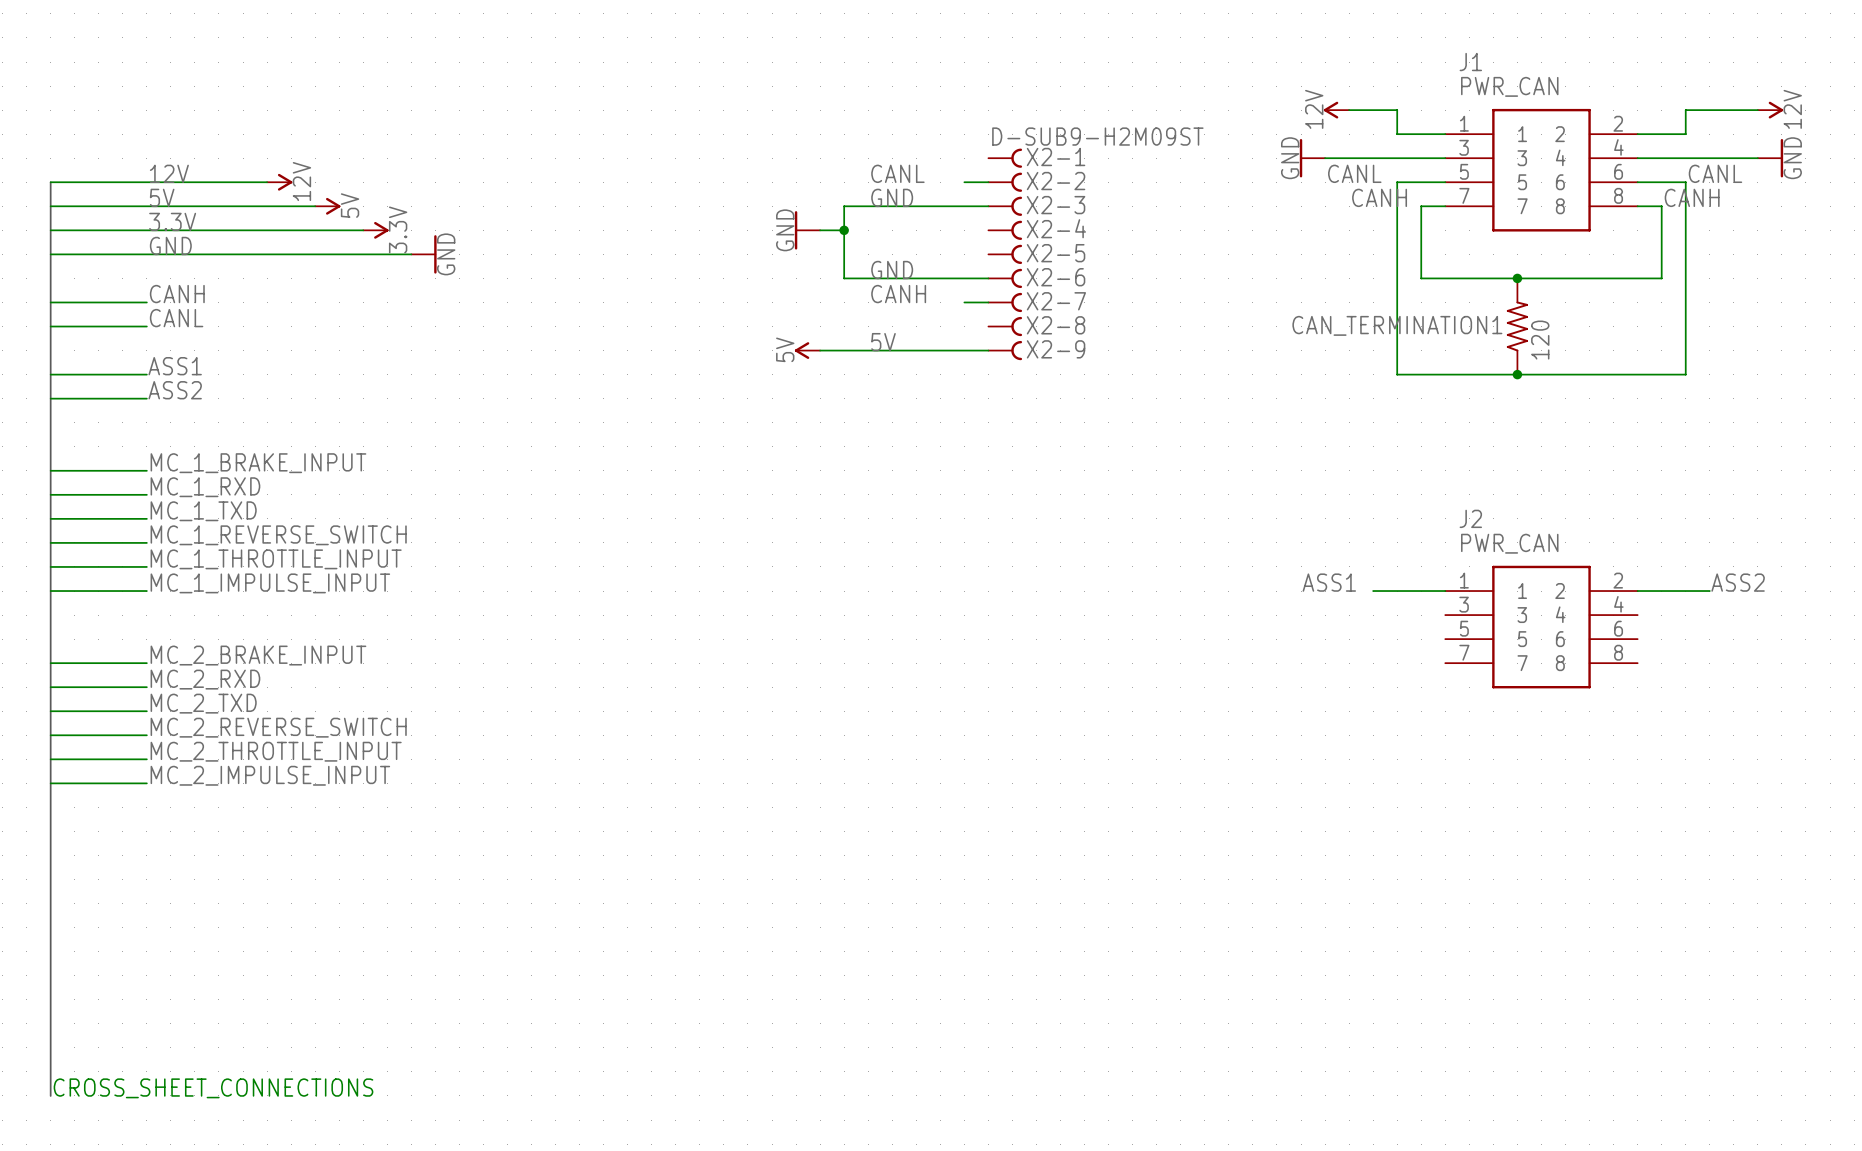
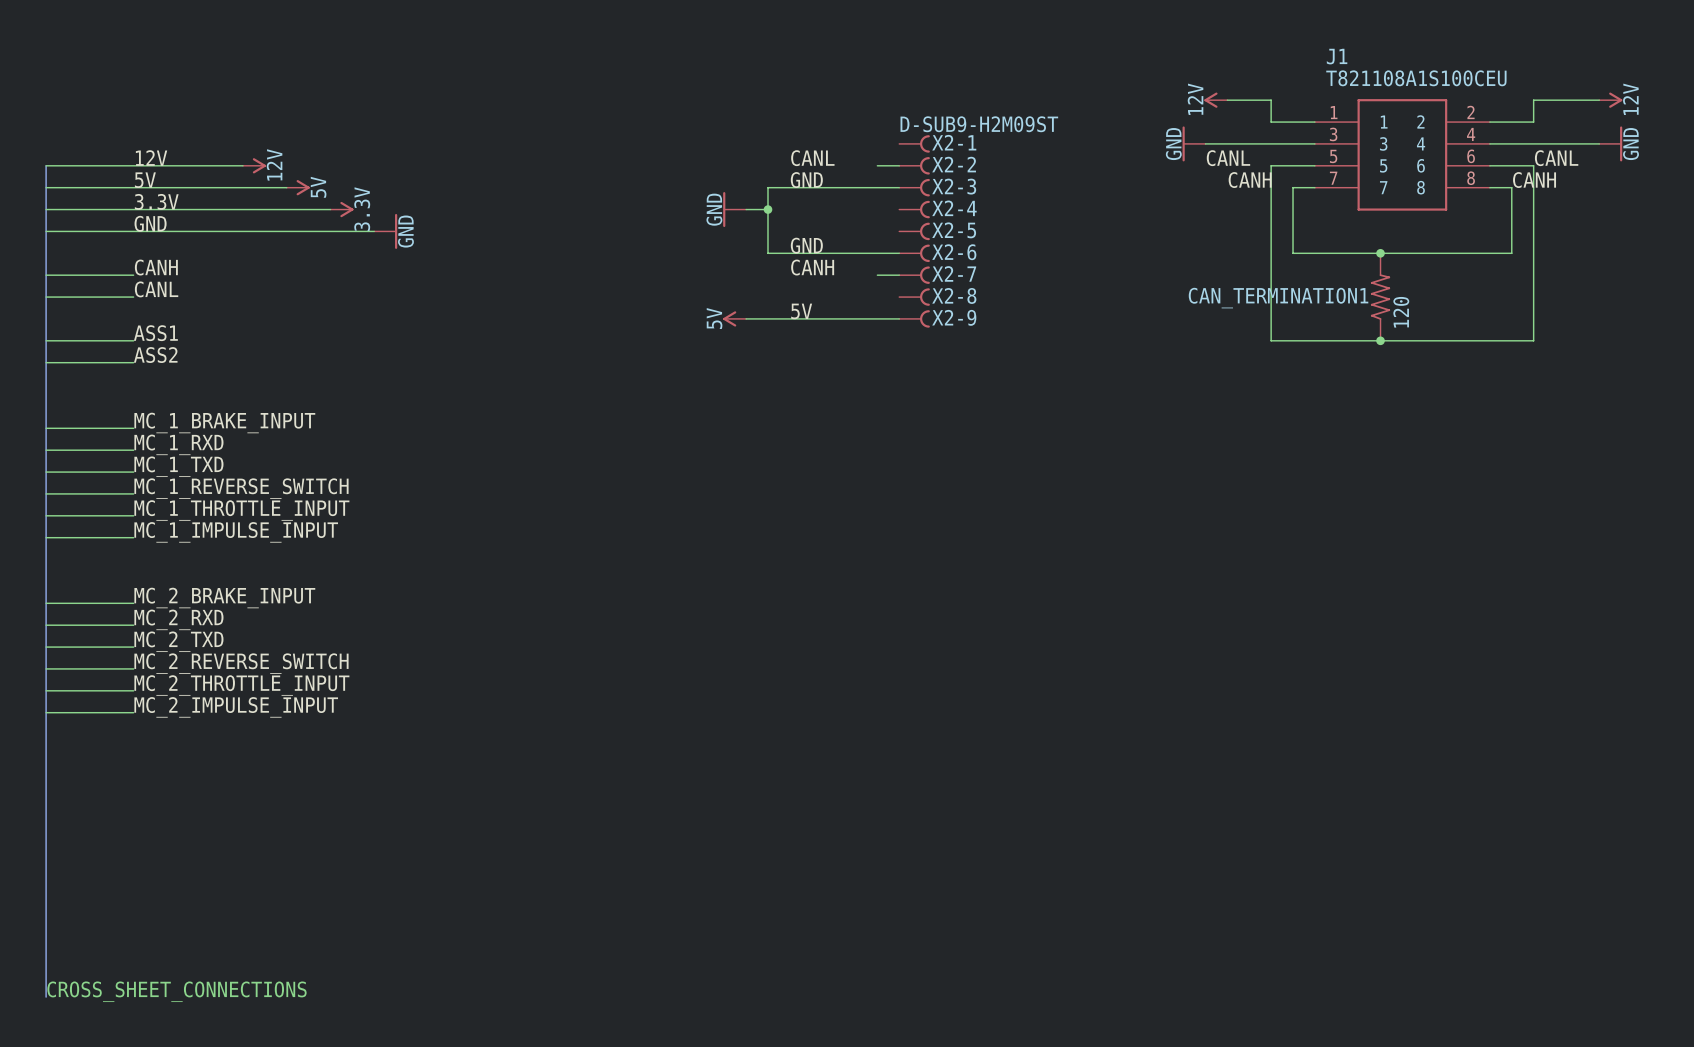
J1 value: PWR_CAN (1509, 86) -> T821108A1S100CEU (1416, 78)
label: ASS1 (1329, 582) -> none
label: ASS2 (1738, 582) -> none
wire: (1373, 591) (1445, 591) -> none
wire: (1637, 591) (1709, 591) -> none
J2: PWR_CAN (1541, 627) -> none

